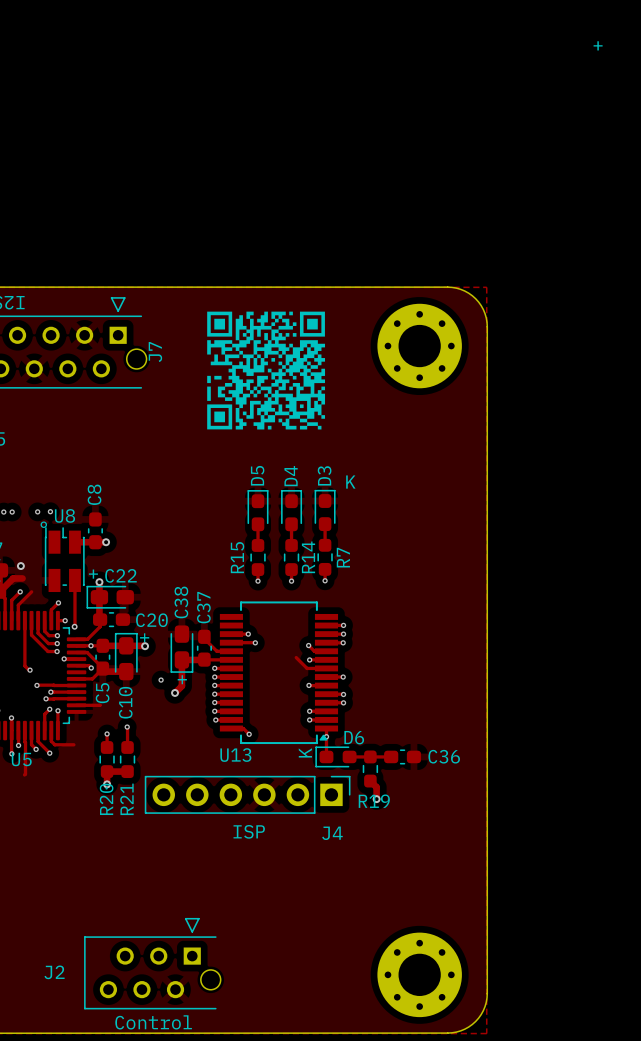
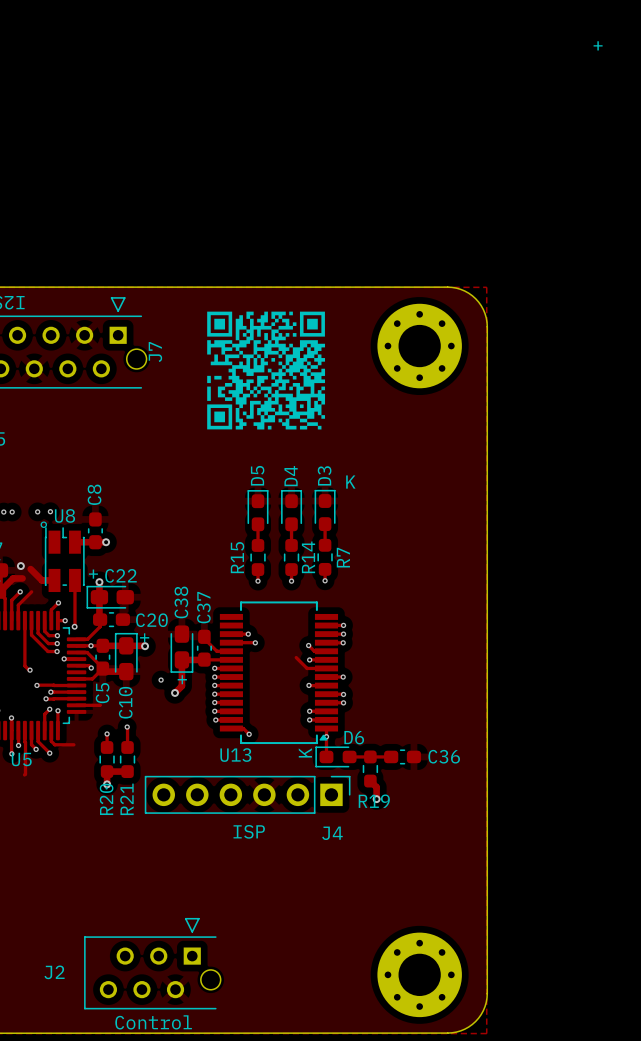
track: none -> (30, 569) (42, 580) (54, 580)

